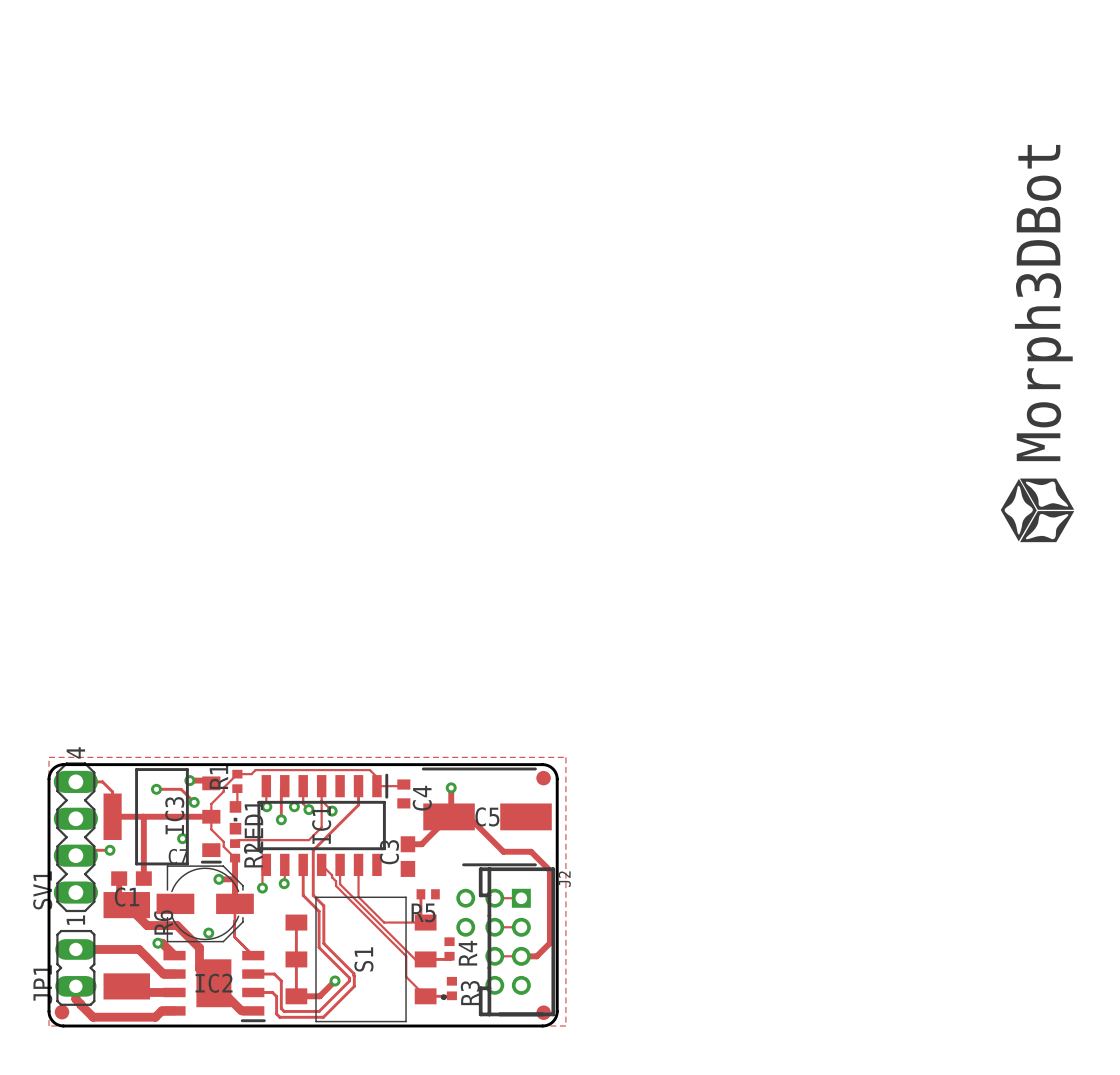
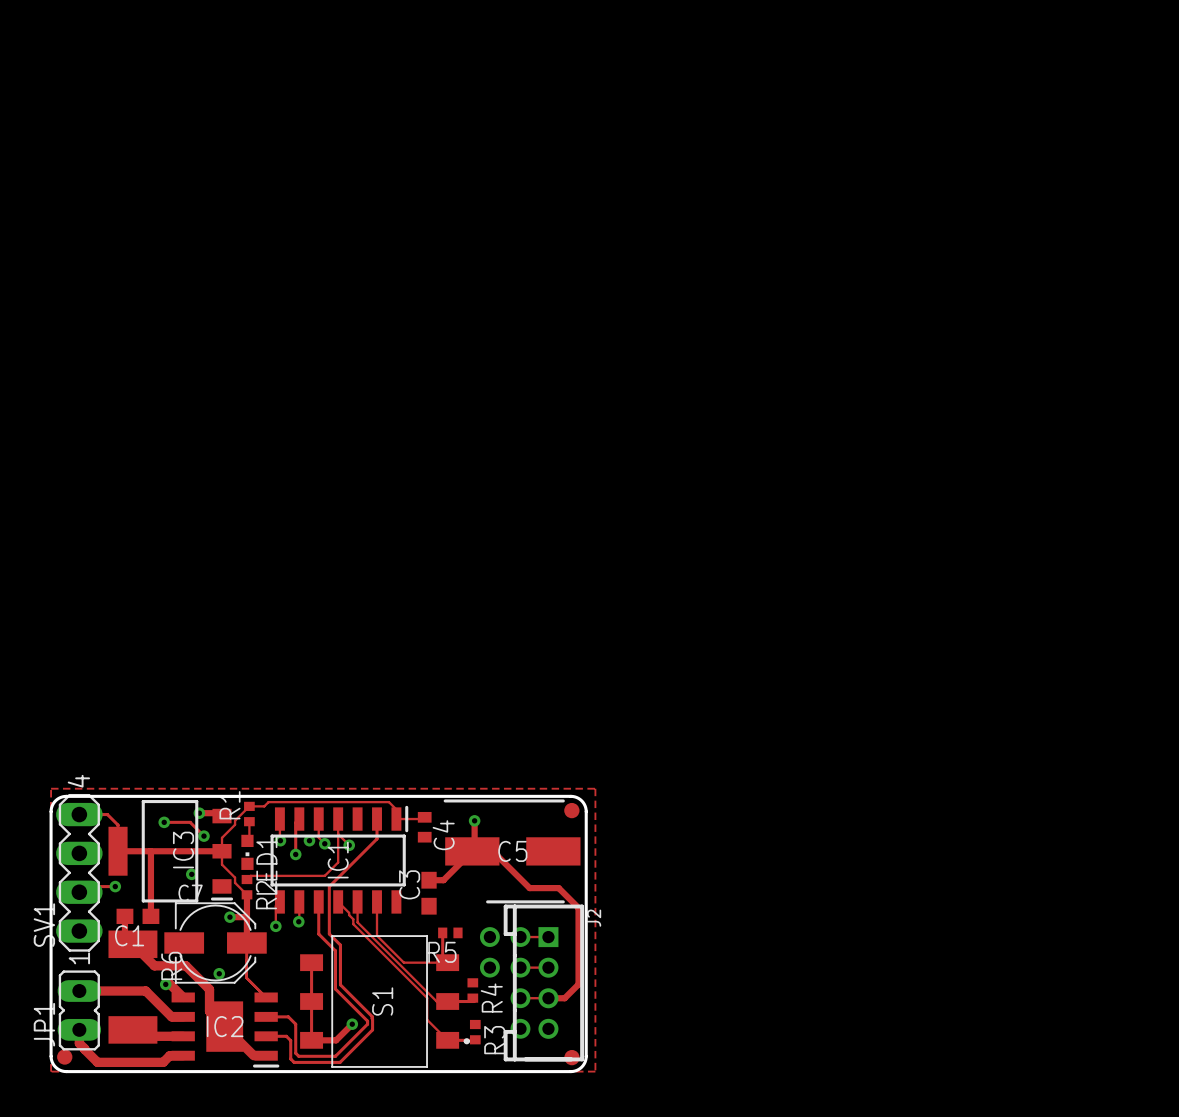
drawing: [1000, 478, 1075, 543] -> none

